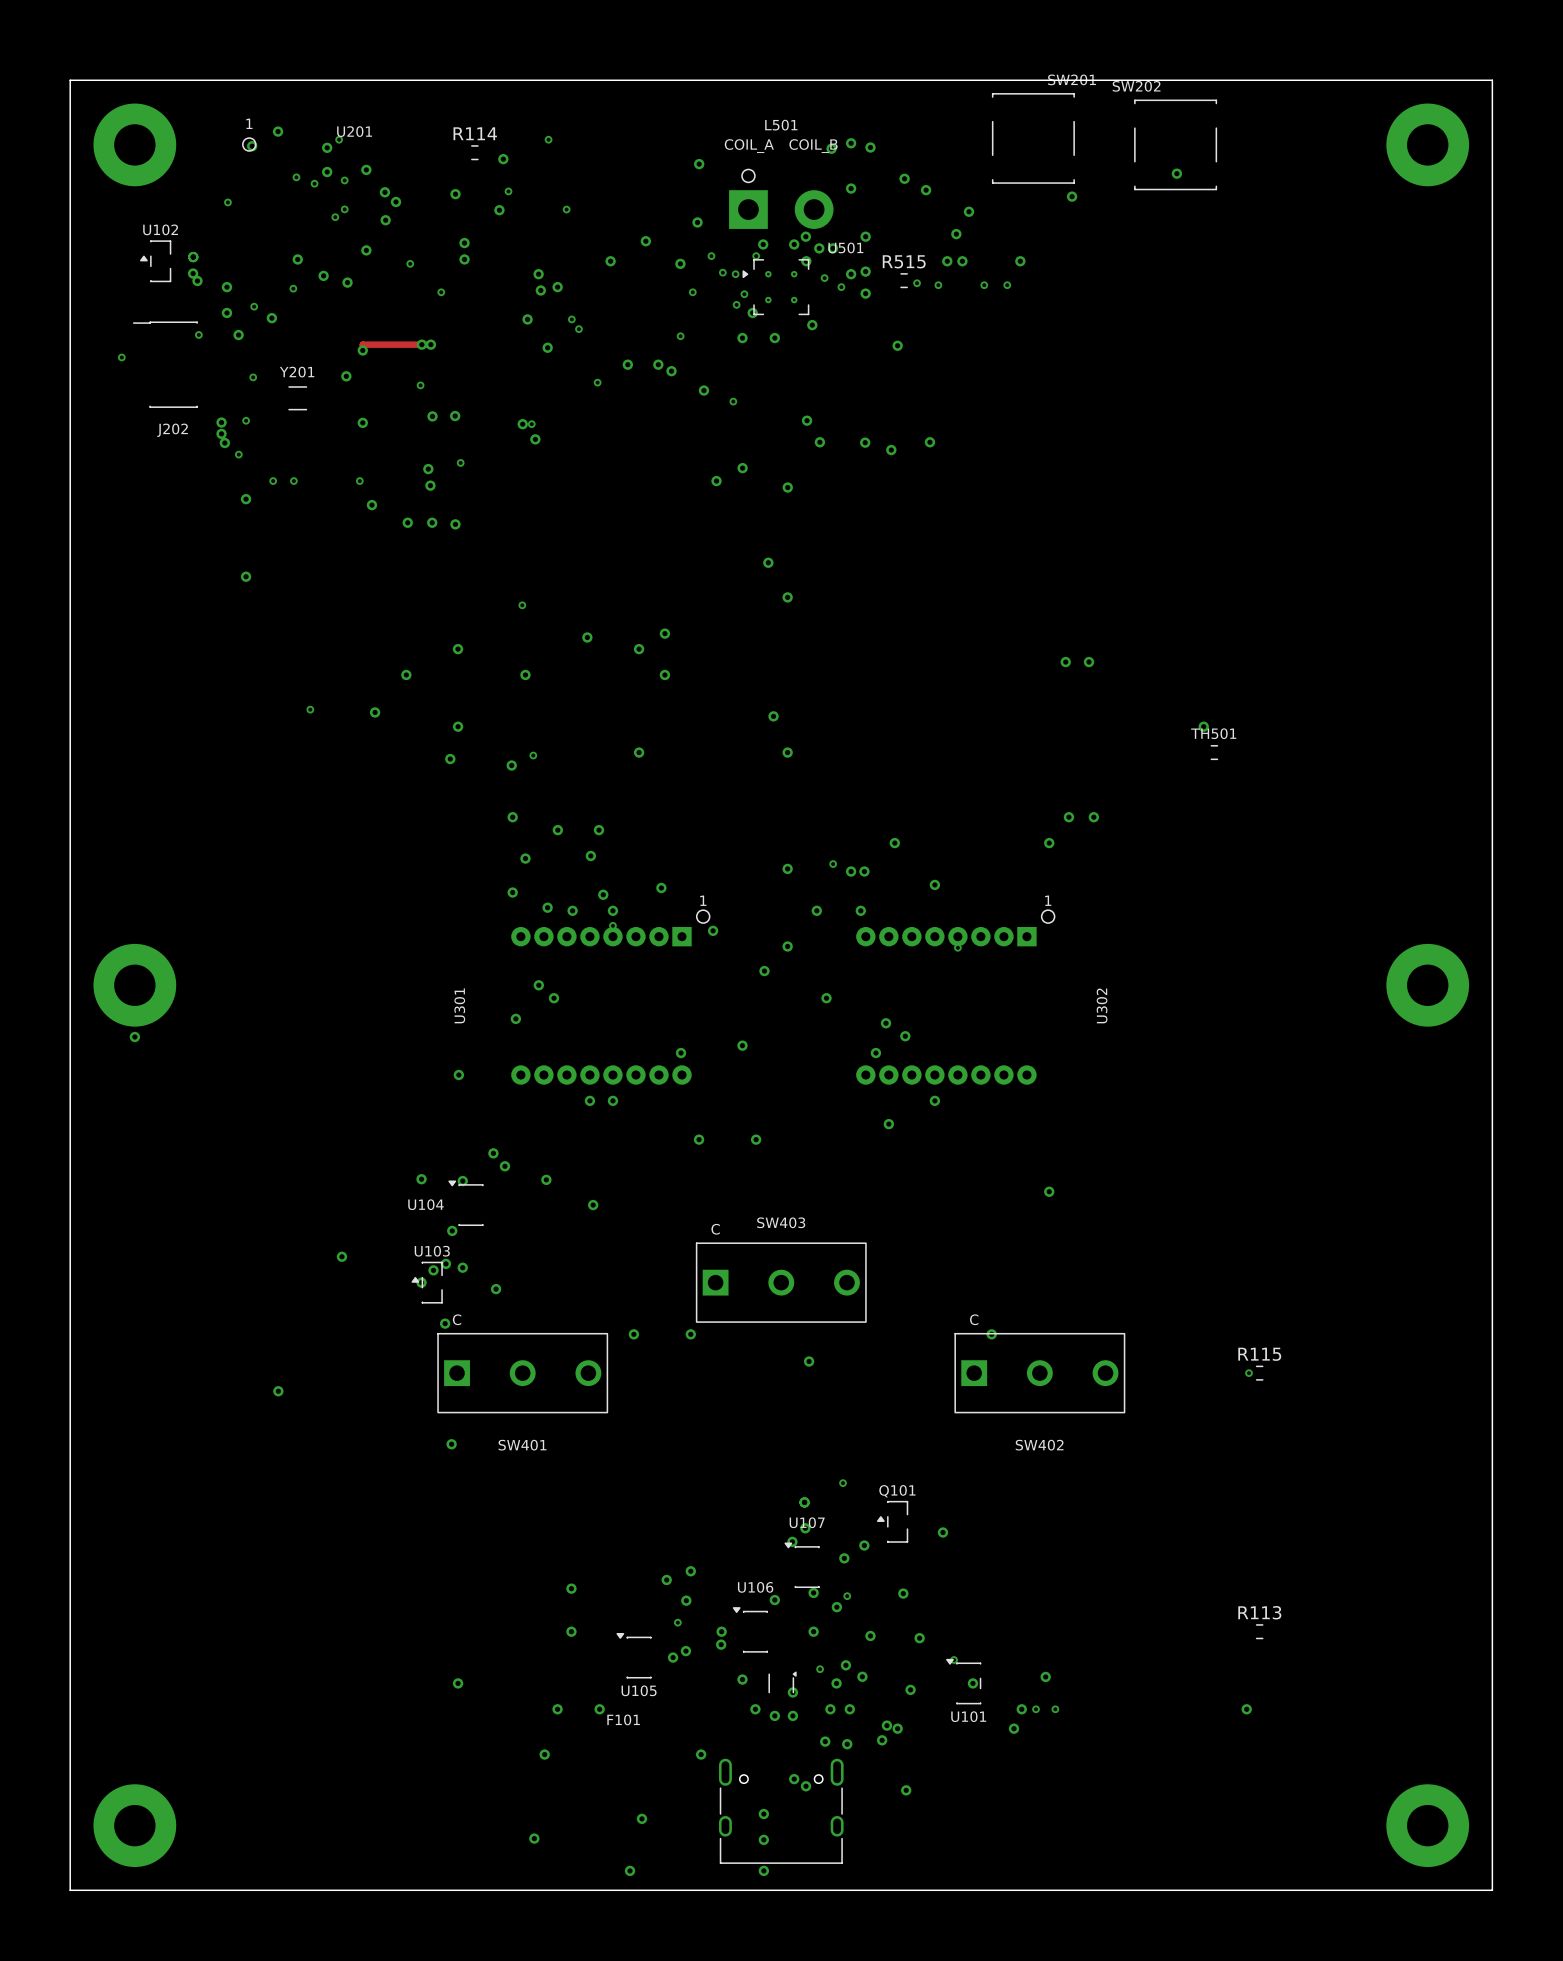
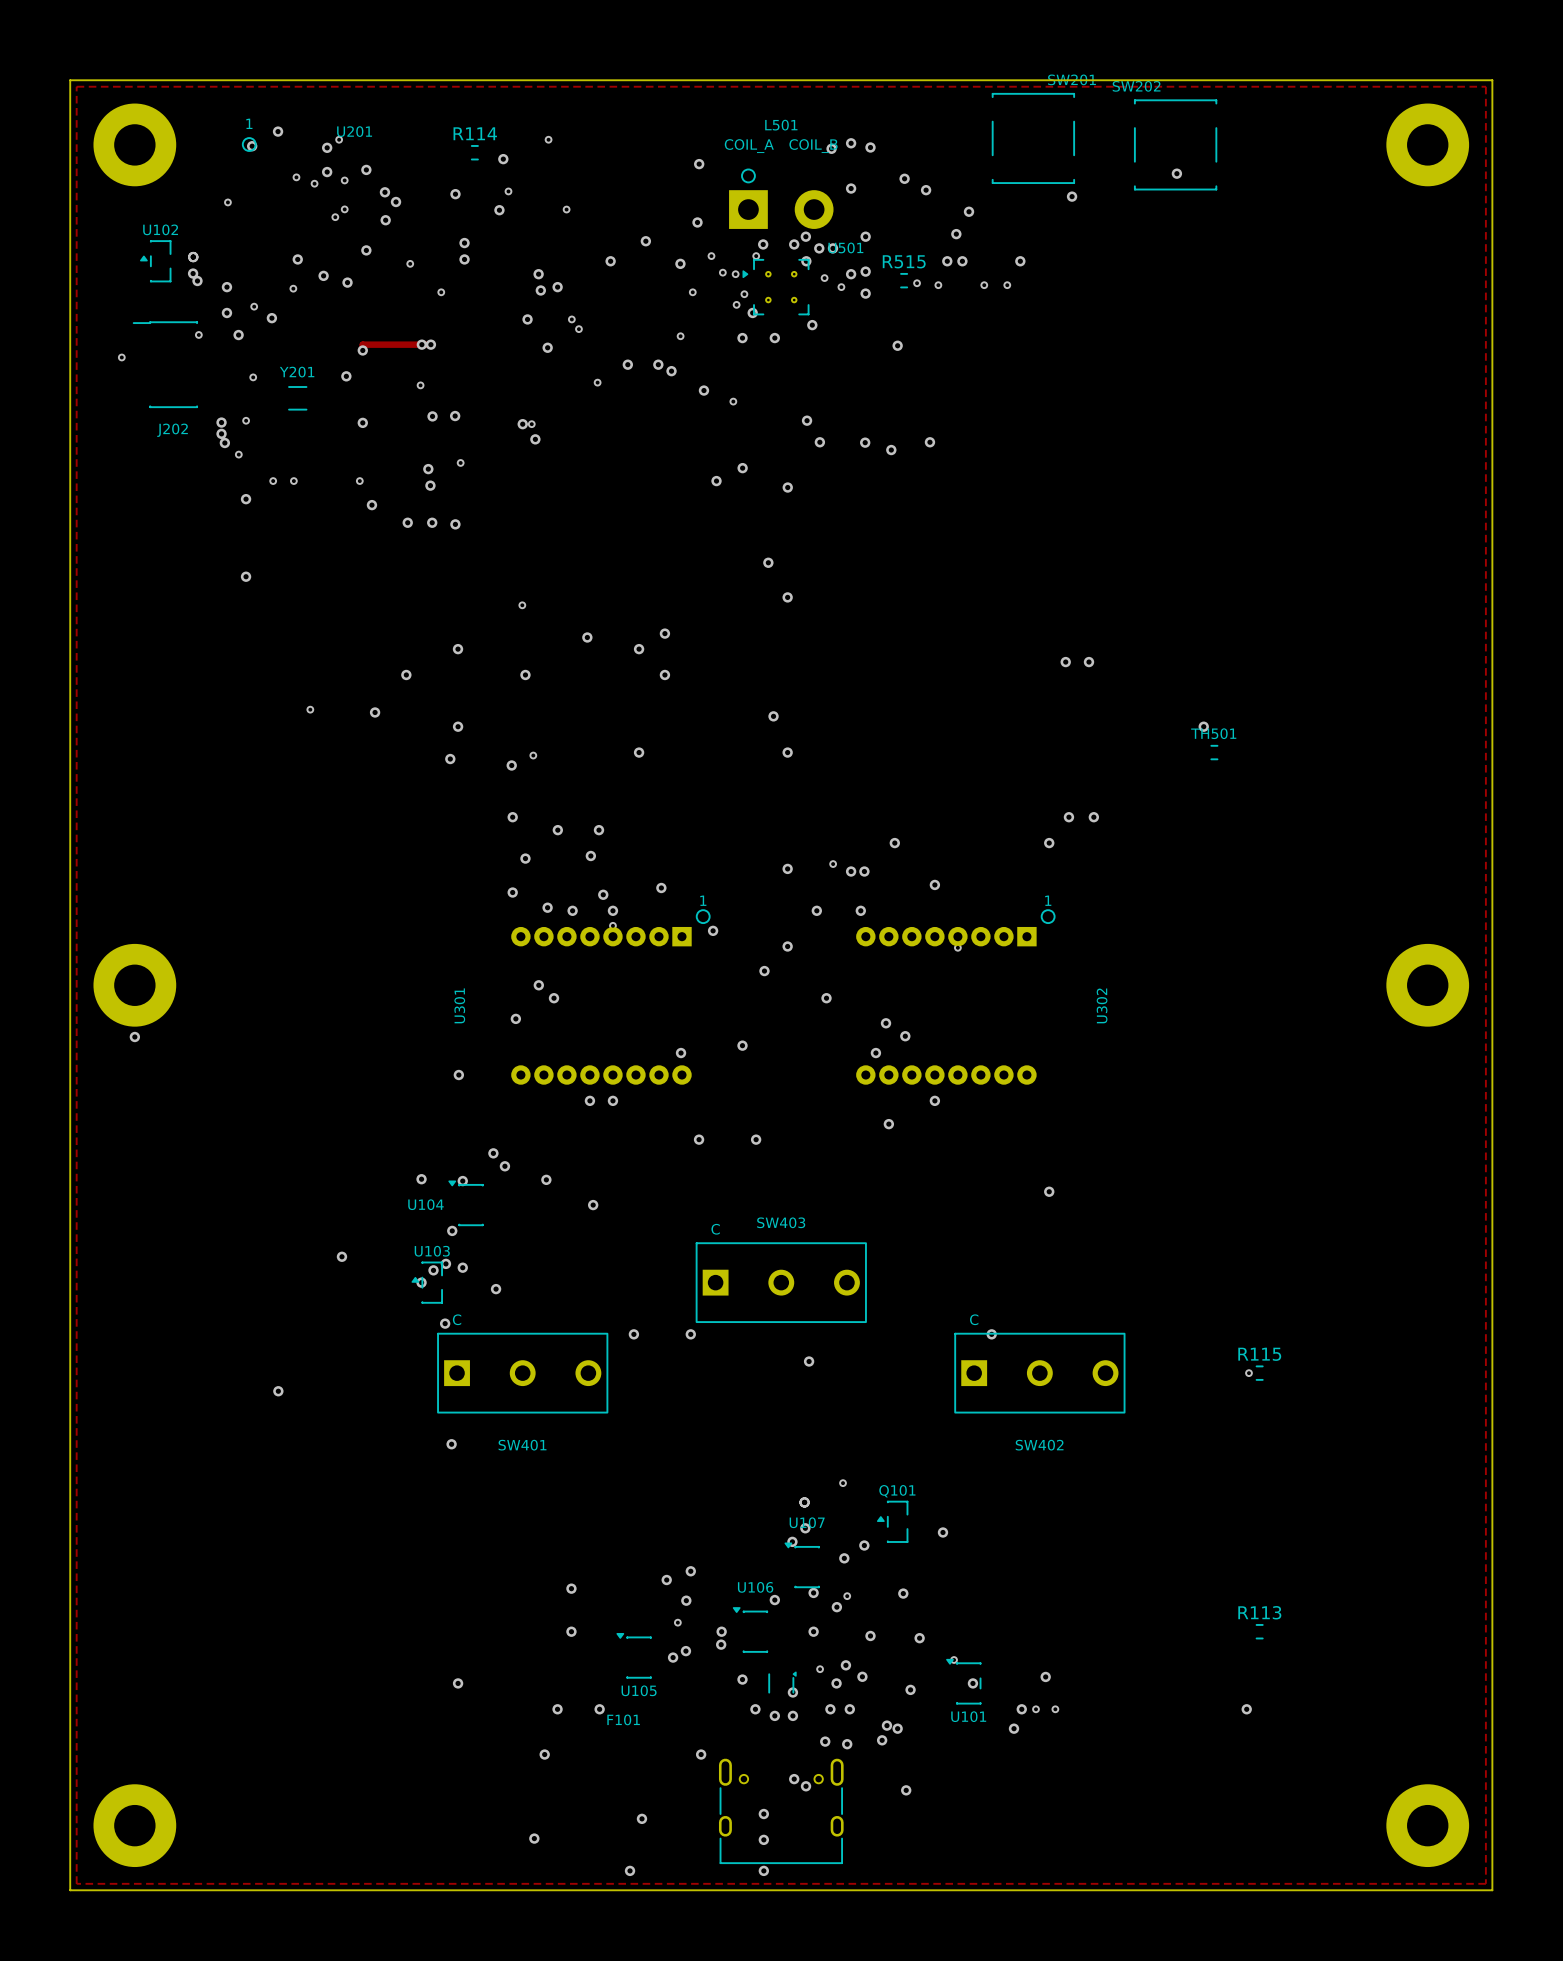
zone outline: none -> (76, 86) (1485, 86) (1485, 1883) (76, 1883) (76, 86)

